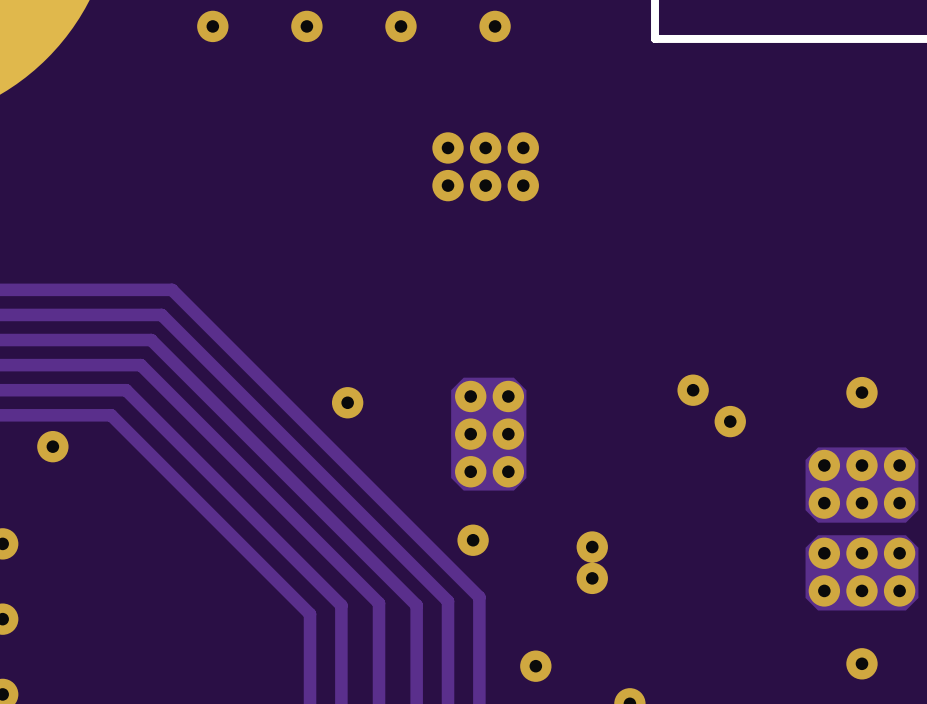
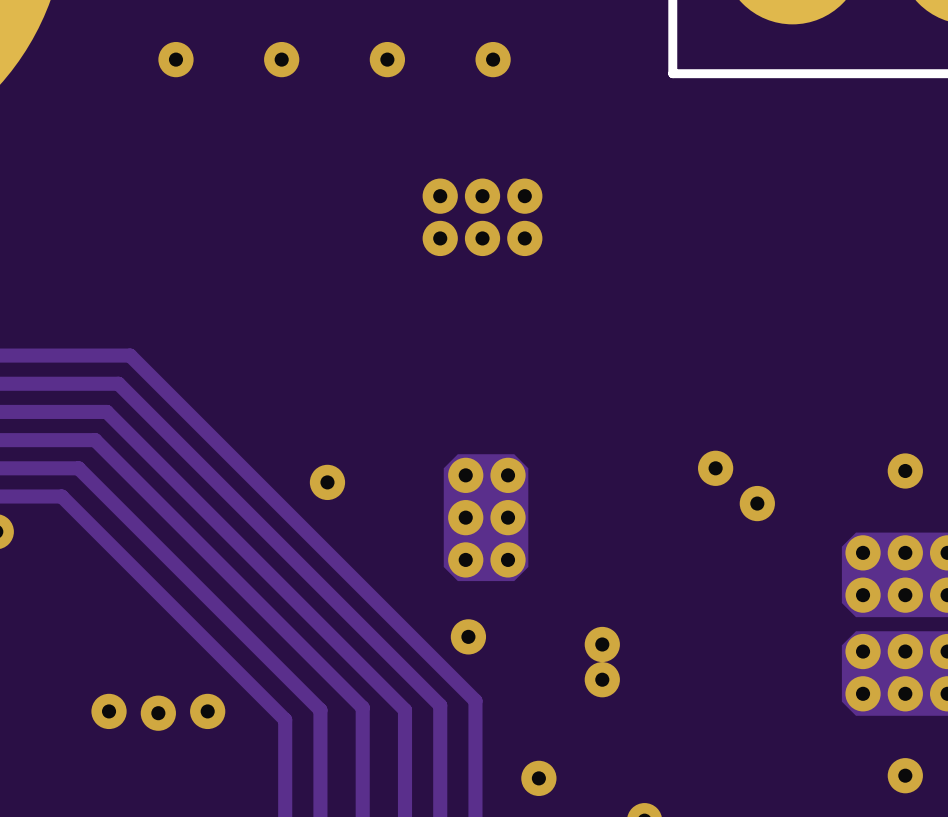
via: none -> (109, 711)
via: none -> (207, 711)
via: none -> (158, 713)

